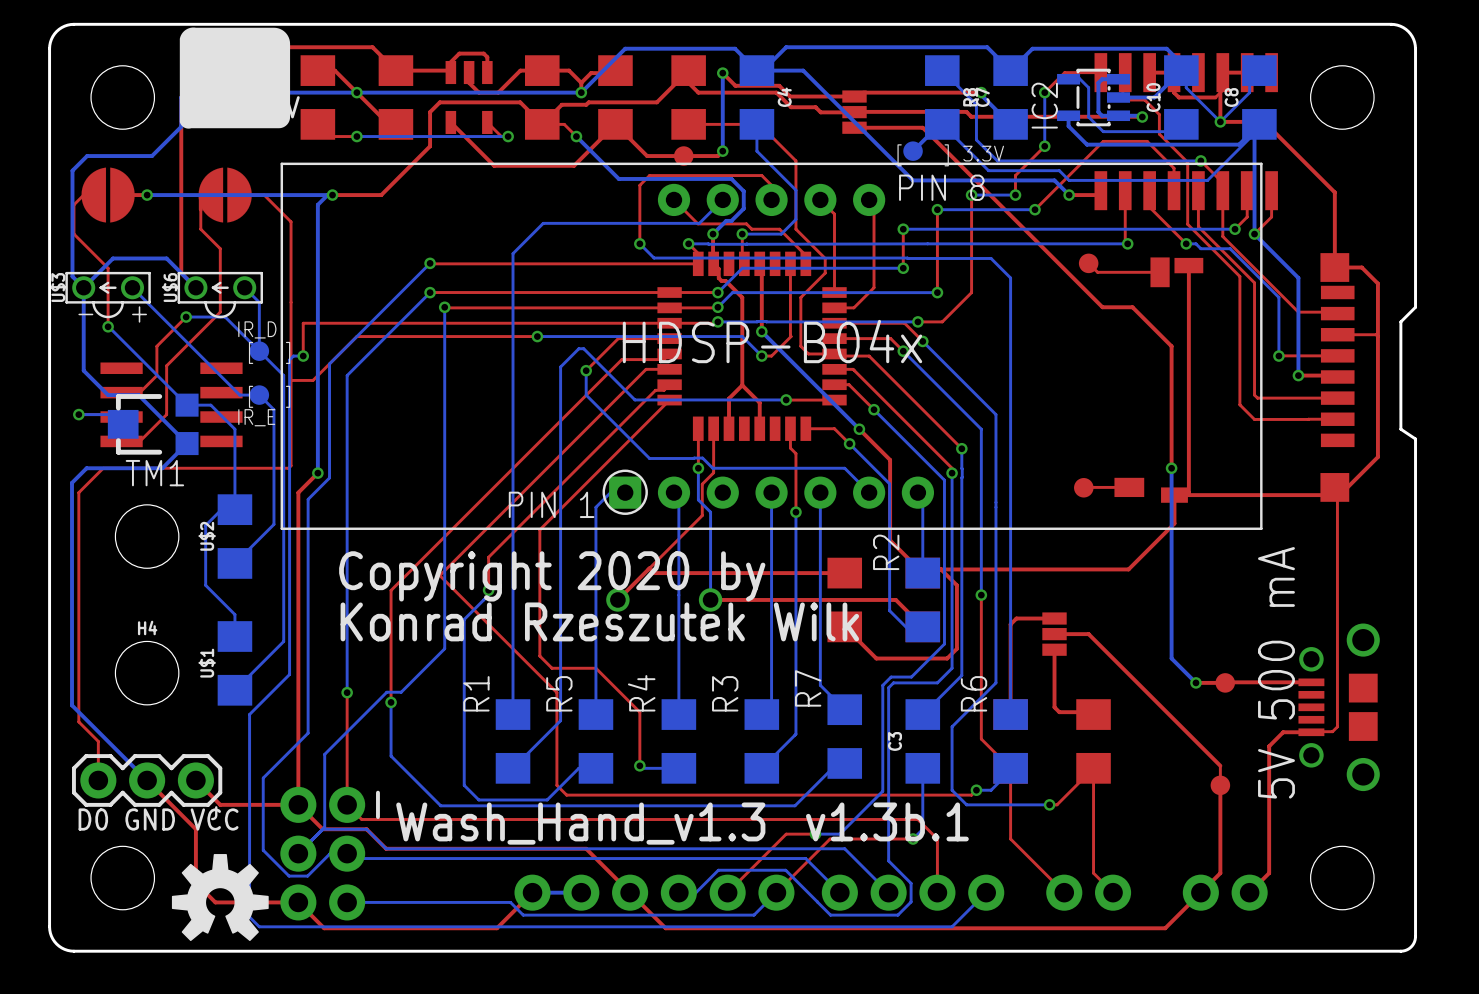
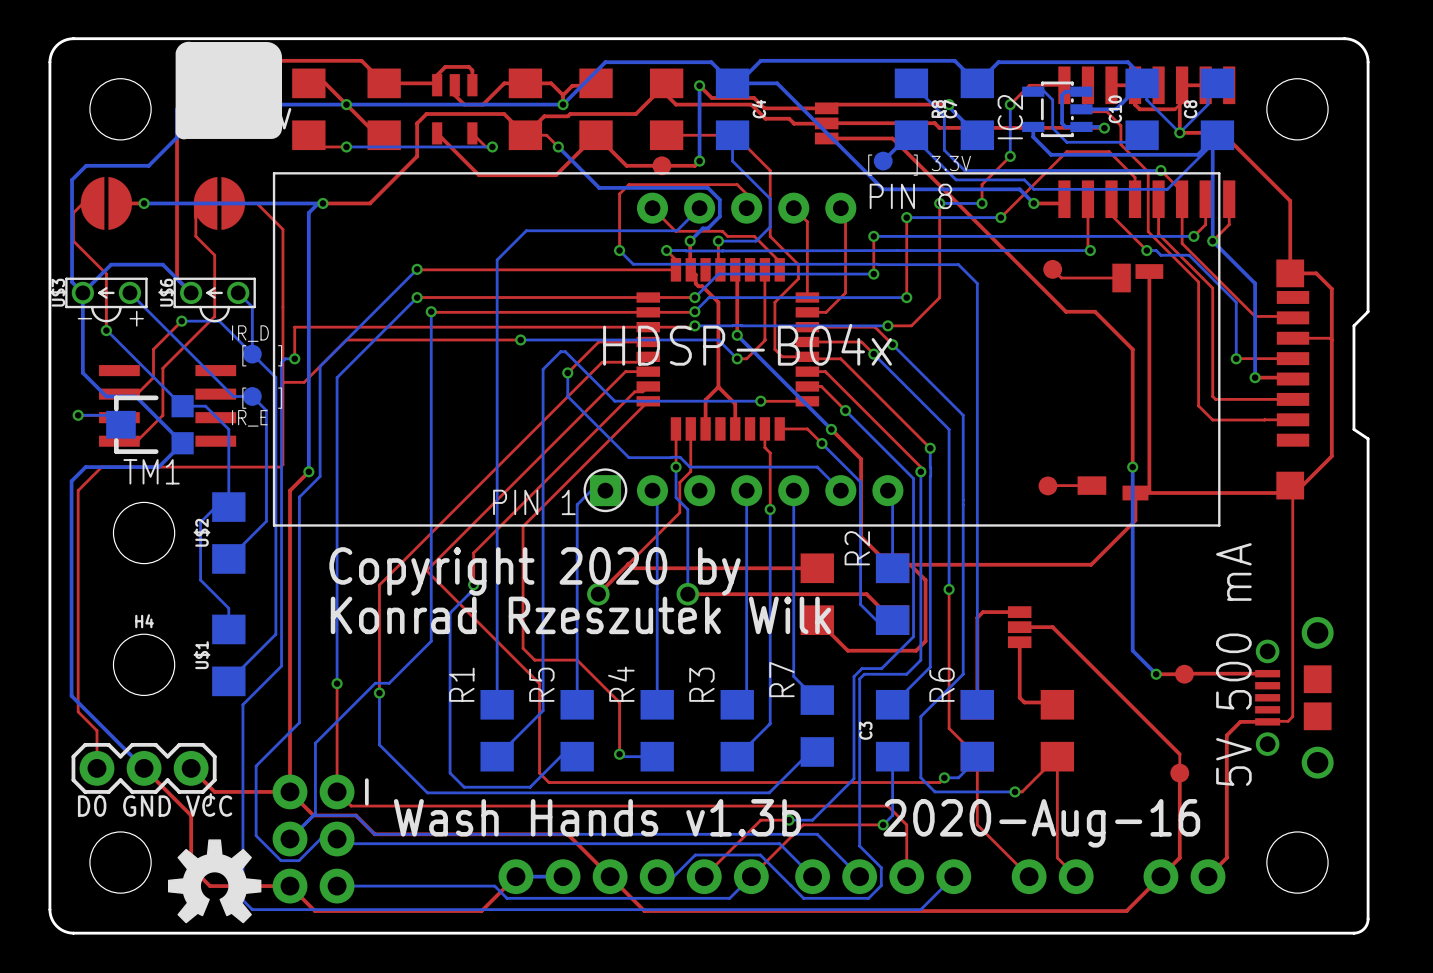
text: v1.3b.1 (887, 821) -> none
text: Wash_Hand_v1.3 (580, 823) -> Wash Hands v1.3b (597, 817)
text: none -> 2020-Aug-16 (1041, 823)

